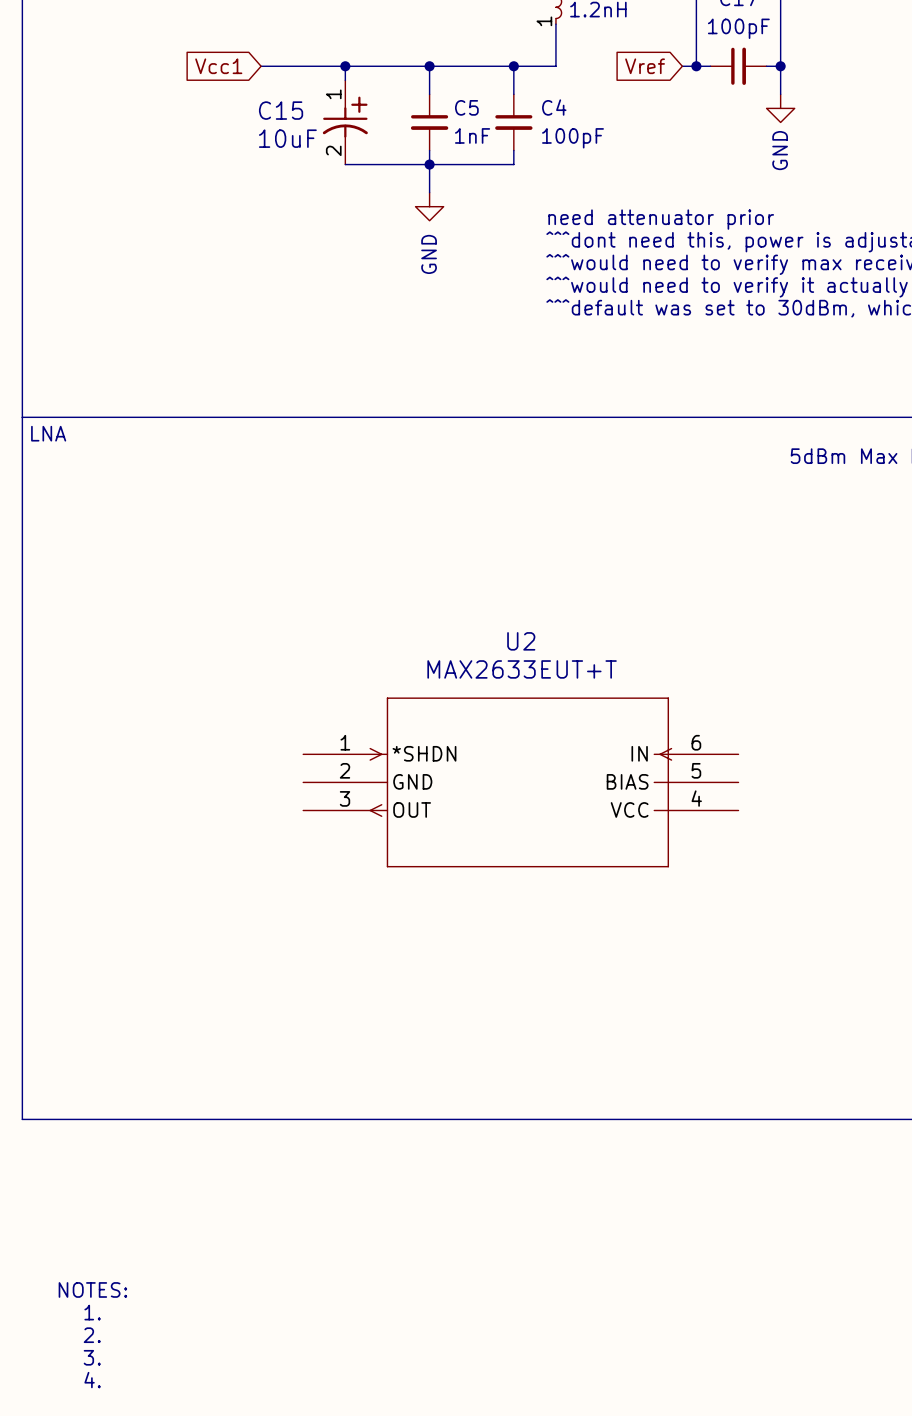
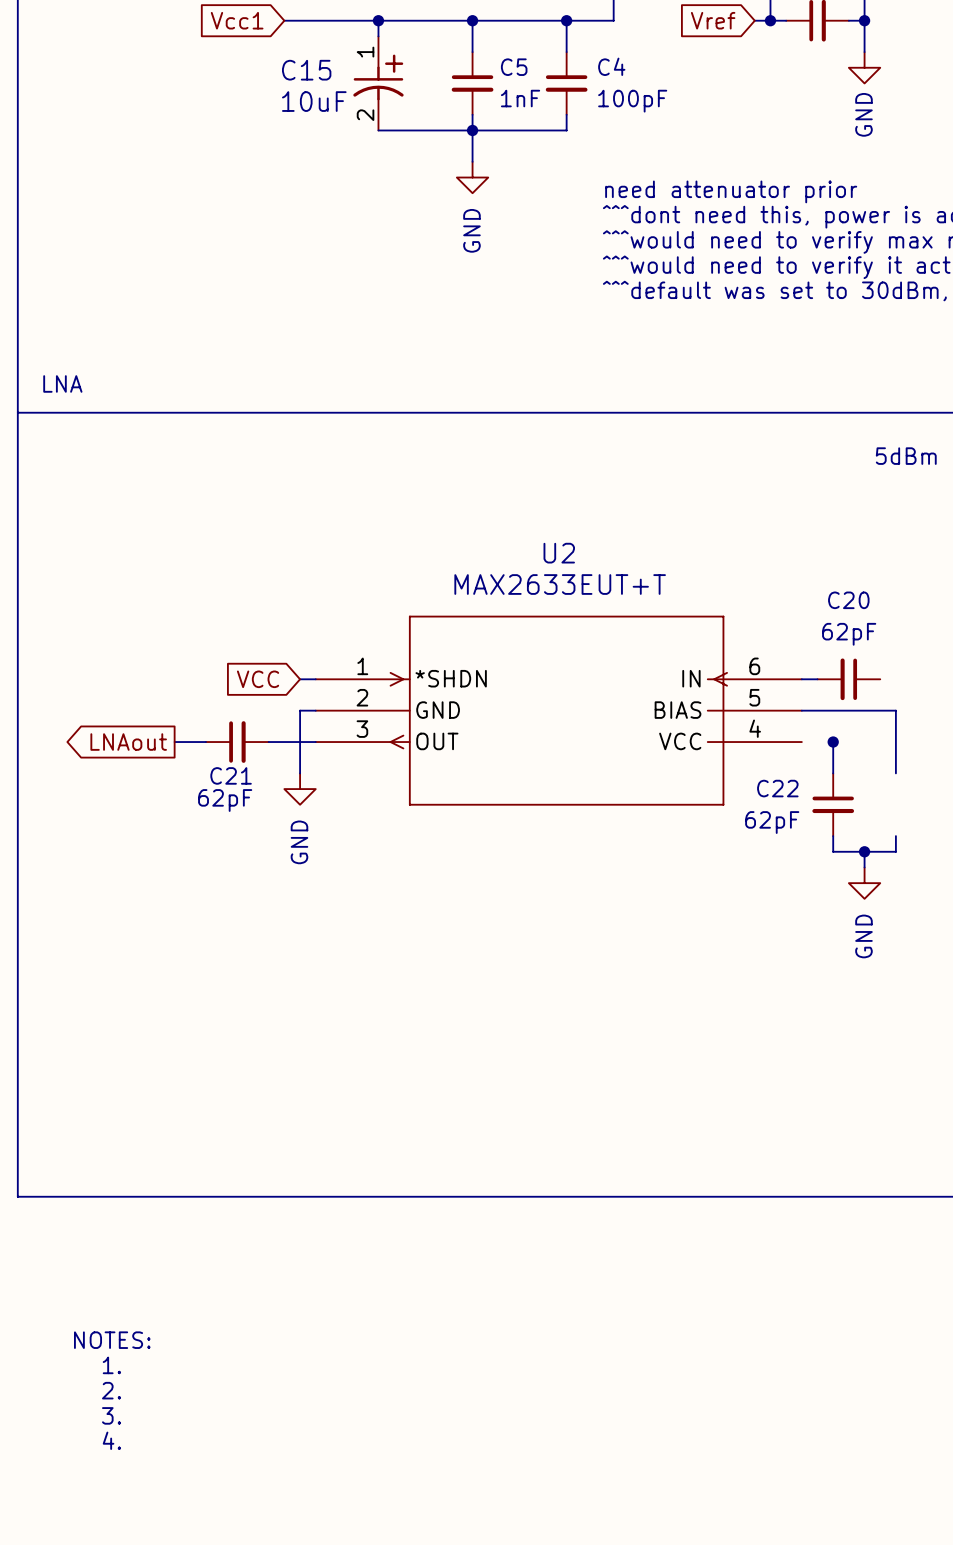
text position: LNA (48, 433) -> LNA (62, 383)
global label: none -> VCC (258, 679)
wire: none -> (300, 679) (315, 679)
wire: none -> (801, 679) (817, 679)
C20: none -> 62pF (848, 679)
wire: none -> (315, 710) (300, 710) (300, 773)
wire: none -> (801, 710) (895, 710) (895, 773)
global label: none -> LNAout (128, 742)
wire: none -> (174, 742) (205, 742)
C21: none -> 62pF (237, 742)
wire: none -> (268, 742) (315, 742)
wire: none -> (833, 742) (833, 773)
junction: none -> (833, 742)
power symbol: none -> GND (300, 789)
C22: none -> 62pF (833, 804)
U2 position: (520, 782) -> (558, 710)
wire: none -> (833, 836) (833, 851) (895, 851) (895, 836)
wire: none -> (864, 851) (864, 867)
junction: none -> (864, 851)
power symbol: none -> GND (864, 883)
text position: NOTES: (92, 1289) -> NOTES: (112, 1340)
text position: 1. (92, 1312) -> 1. (111, 1365)
text position: 2. (92, 1335) -> 2. (111, 1390)
text position: 3. (92, 1357) -> 3. (111, 1415)
text position: 4. (92, 1380) -> 4. (111, 1440)

